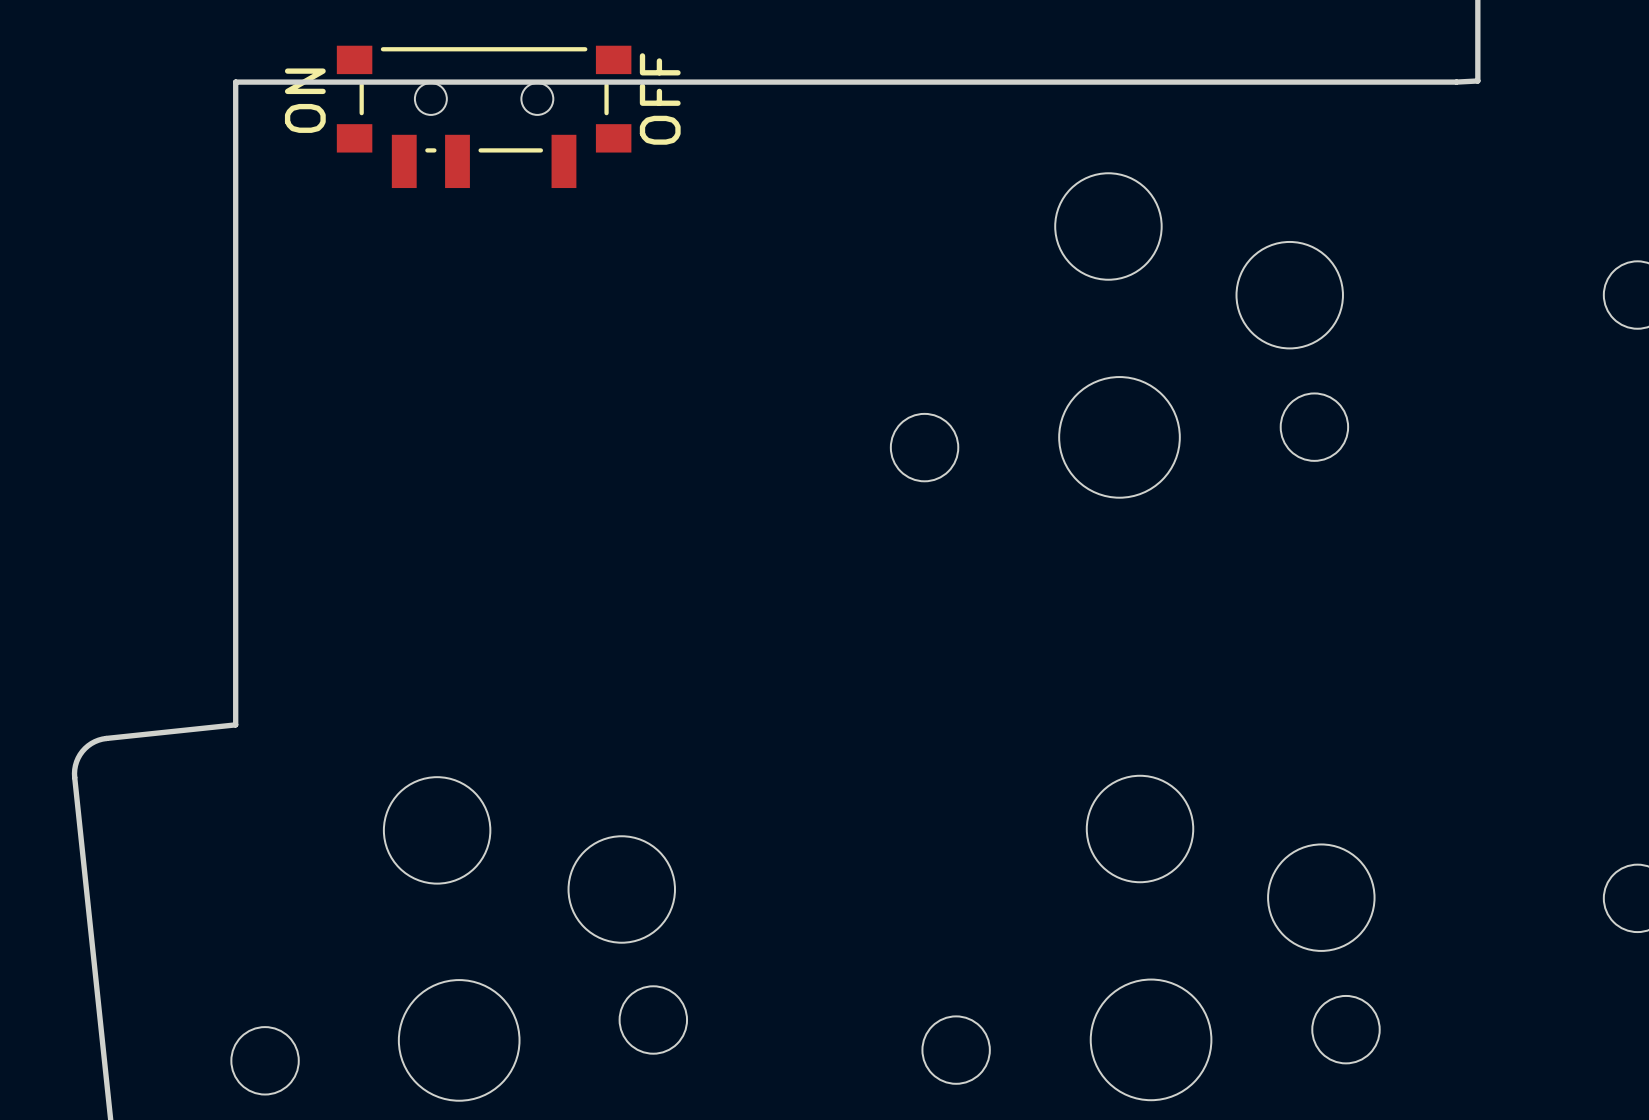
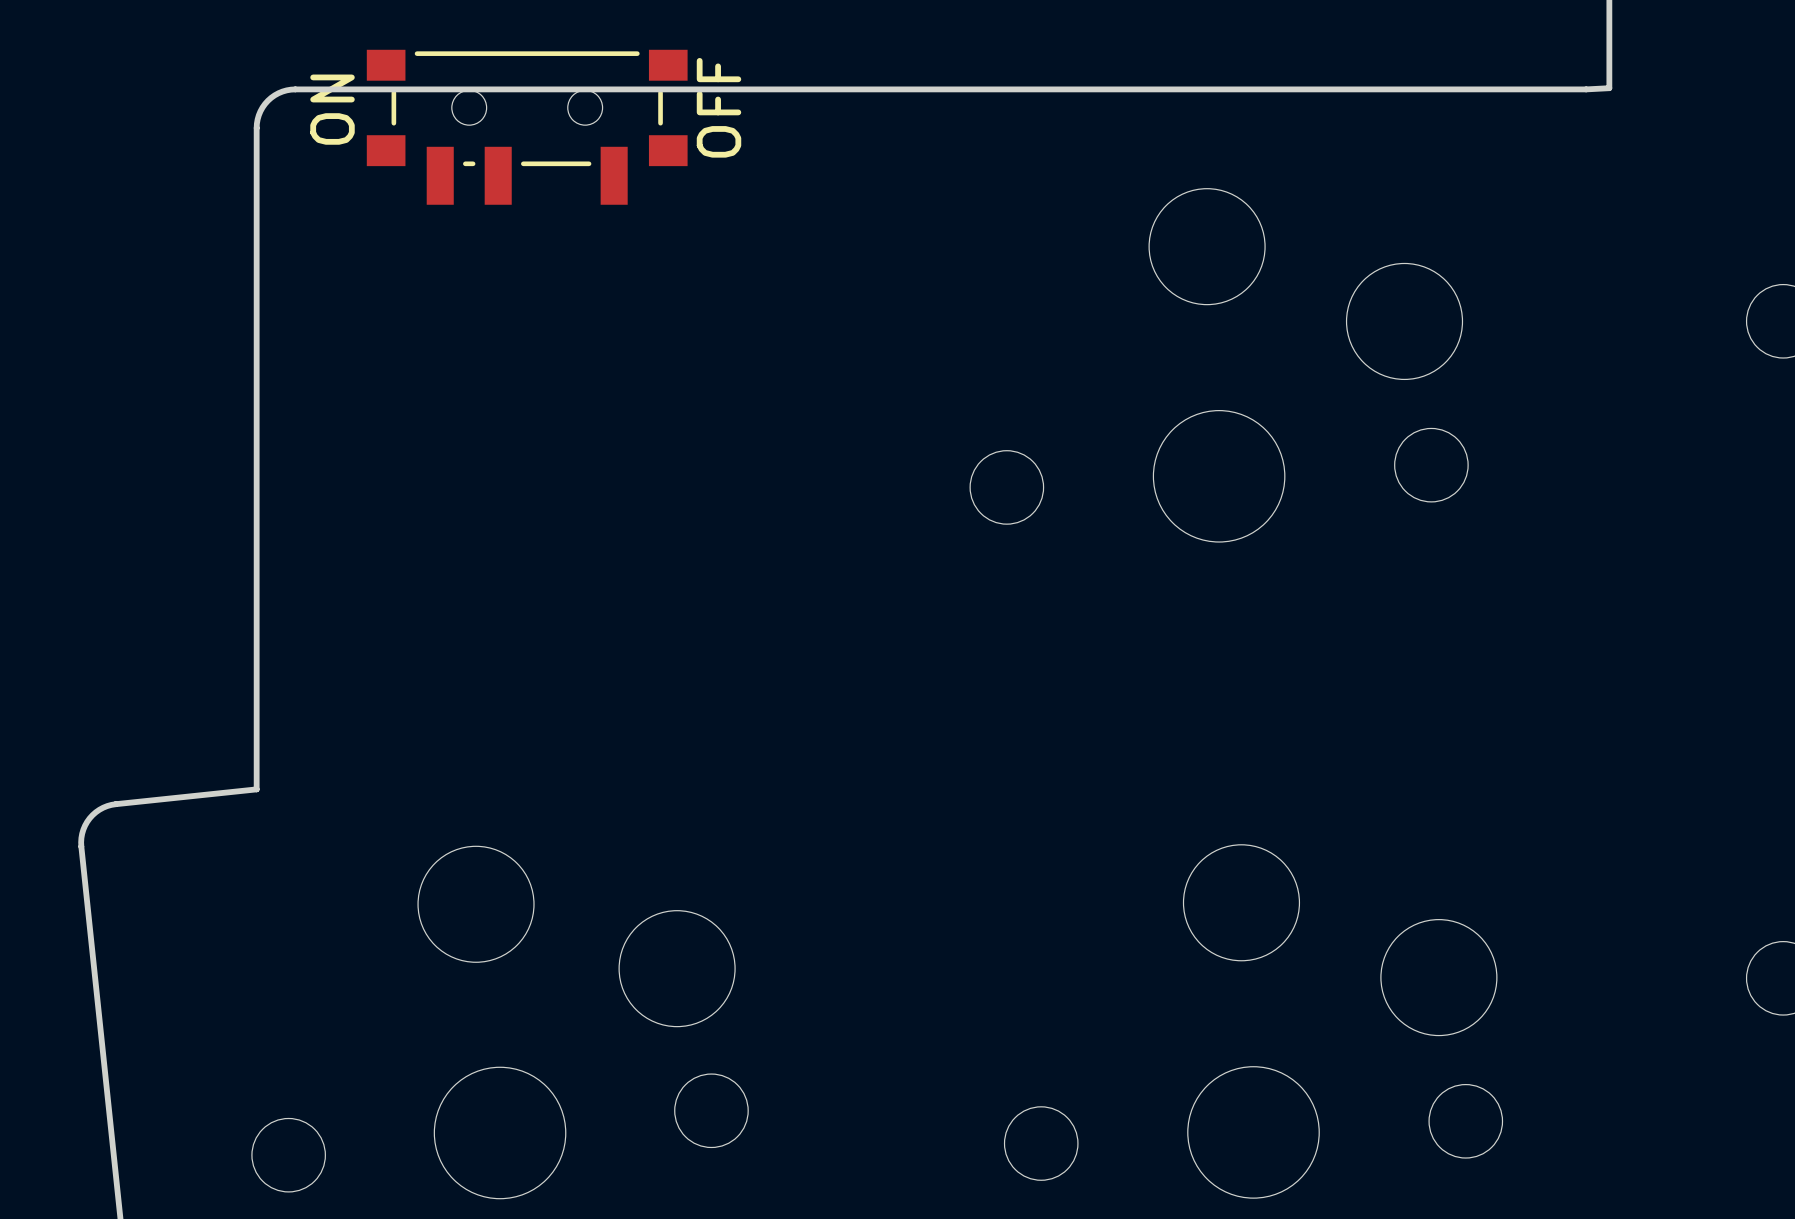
board edge: (271, 82) (235, 82) (235, 117) -> (295, 89) (282, 91) (267, 100) (258, 115) (256, 128)

